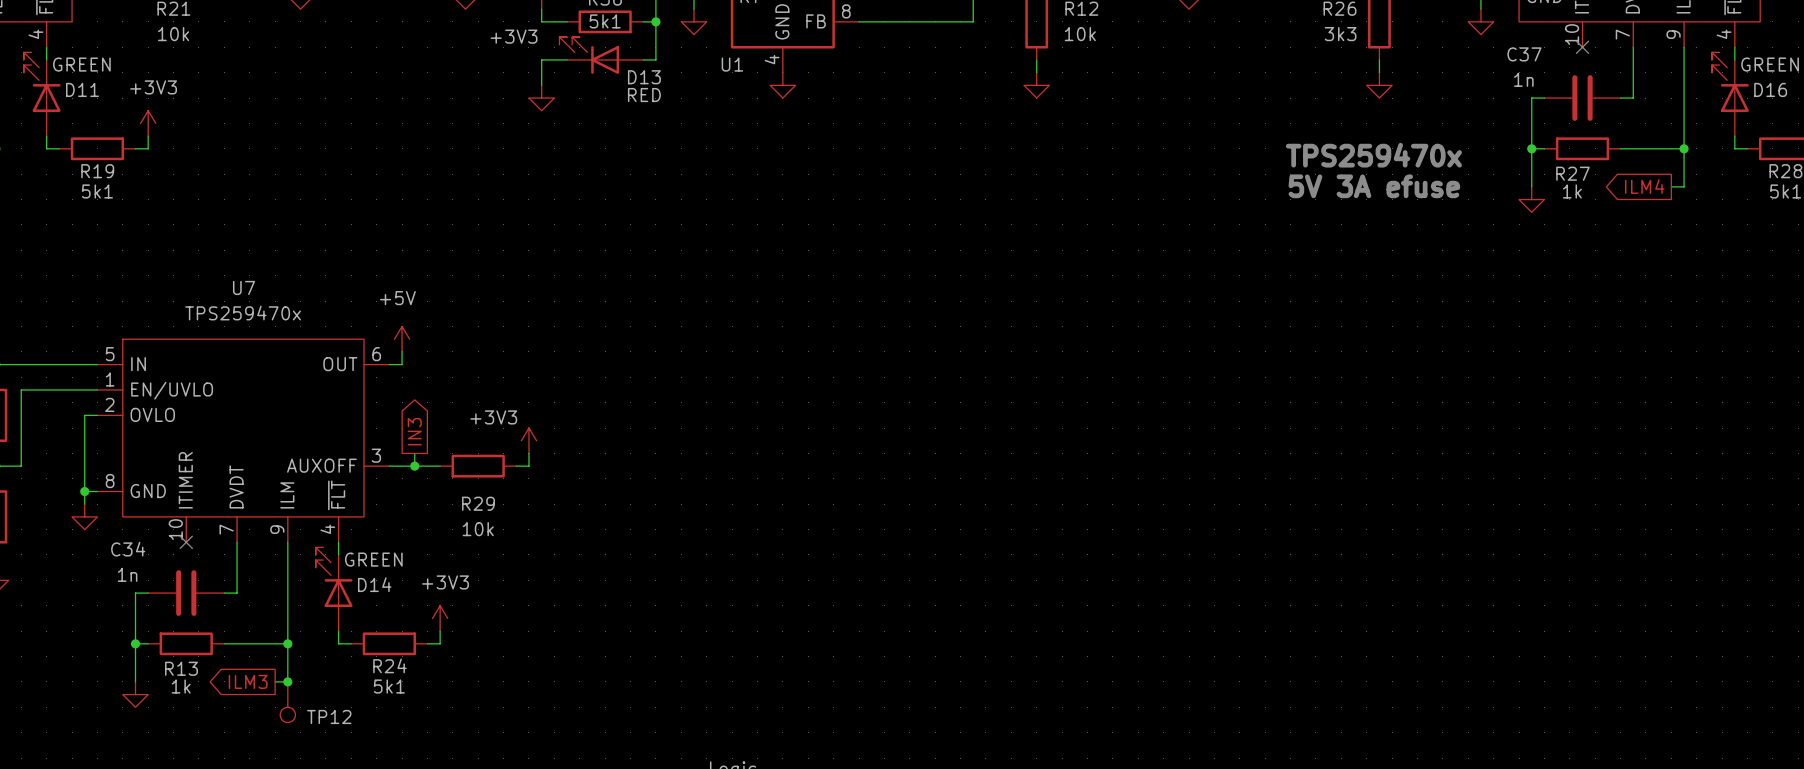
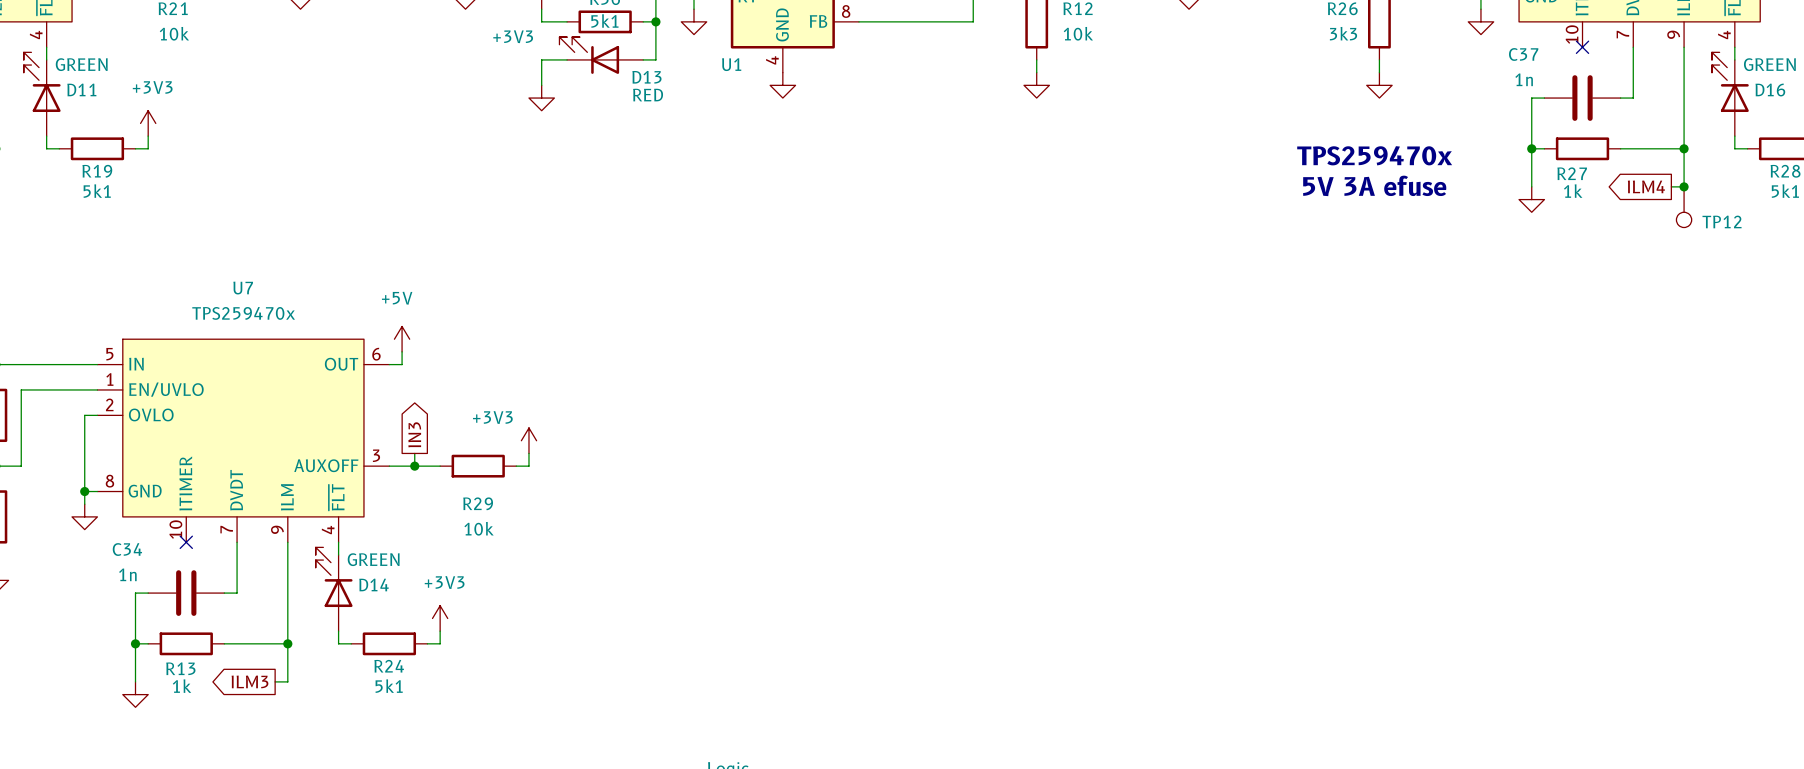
junction: none -> (1684, 186)
junction: (287, 681) -> none
TP12 position: (287, 702) -> (1684, 207)

